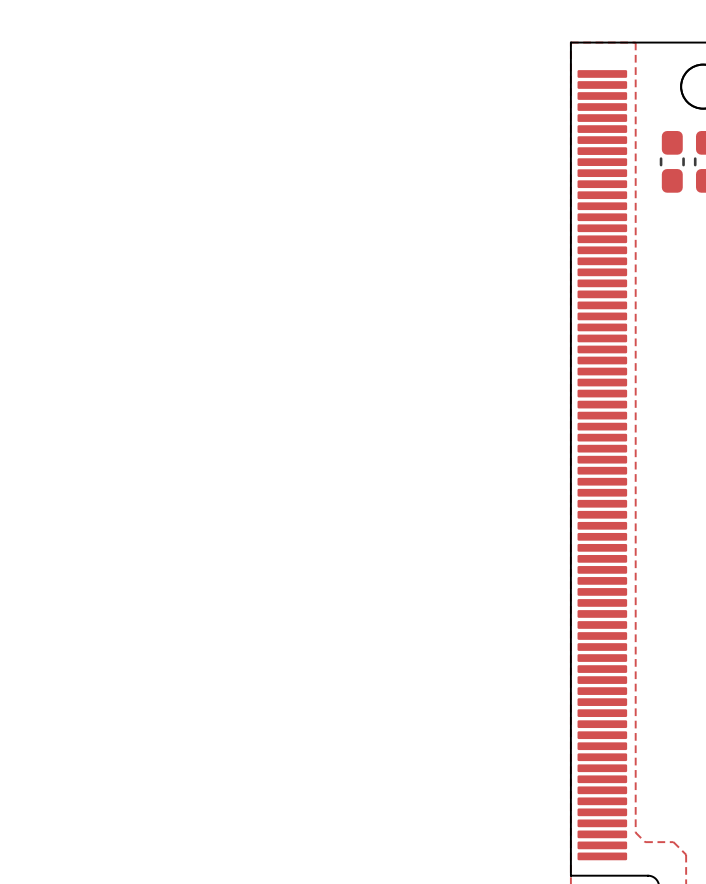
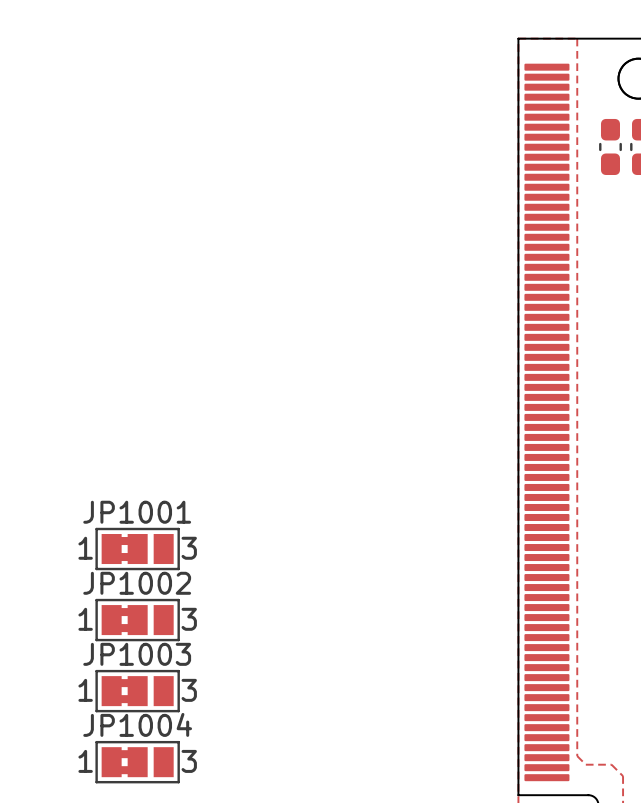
JP1001: none -> (137, 549)
JP1002: none -> (137, 620)
JP1003: none -> (137, 691)
JP1004: none -> (137, 762)

